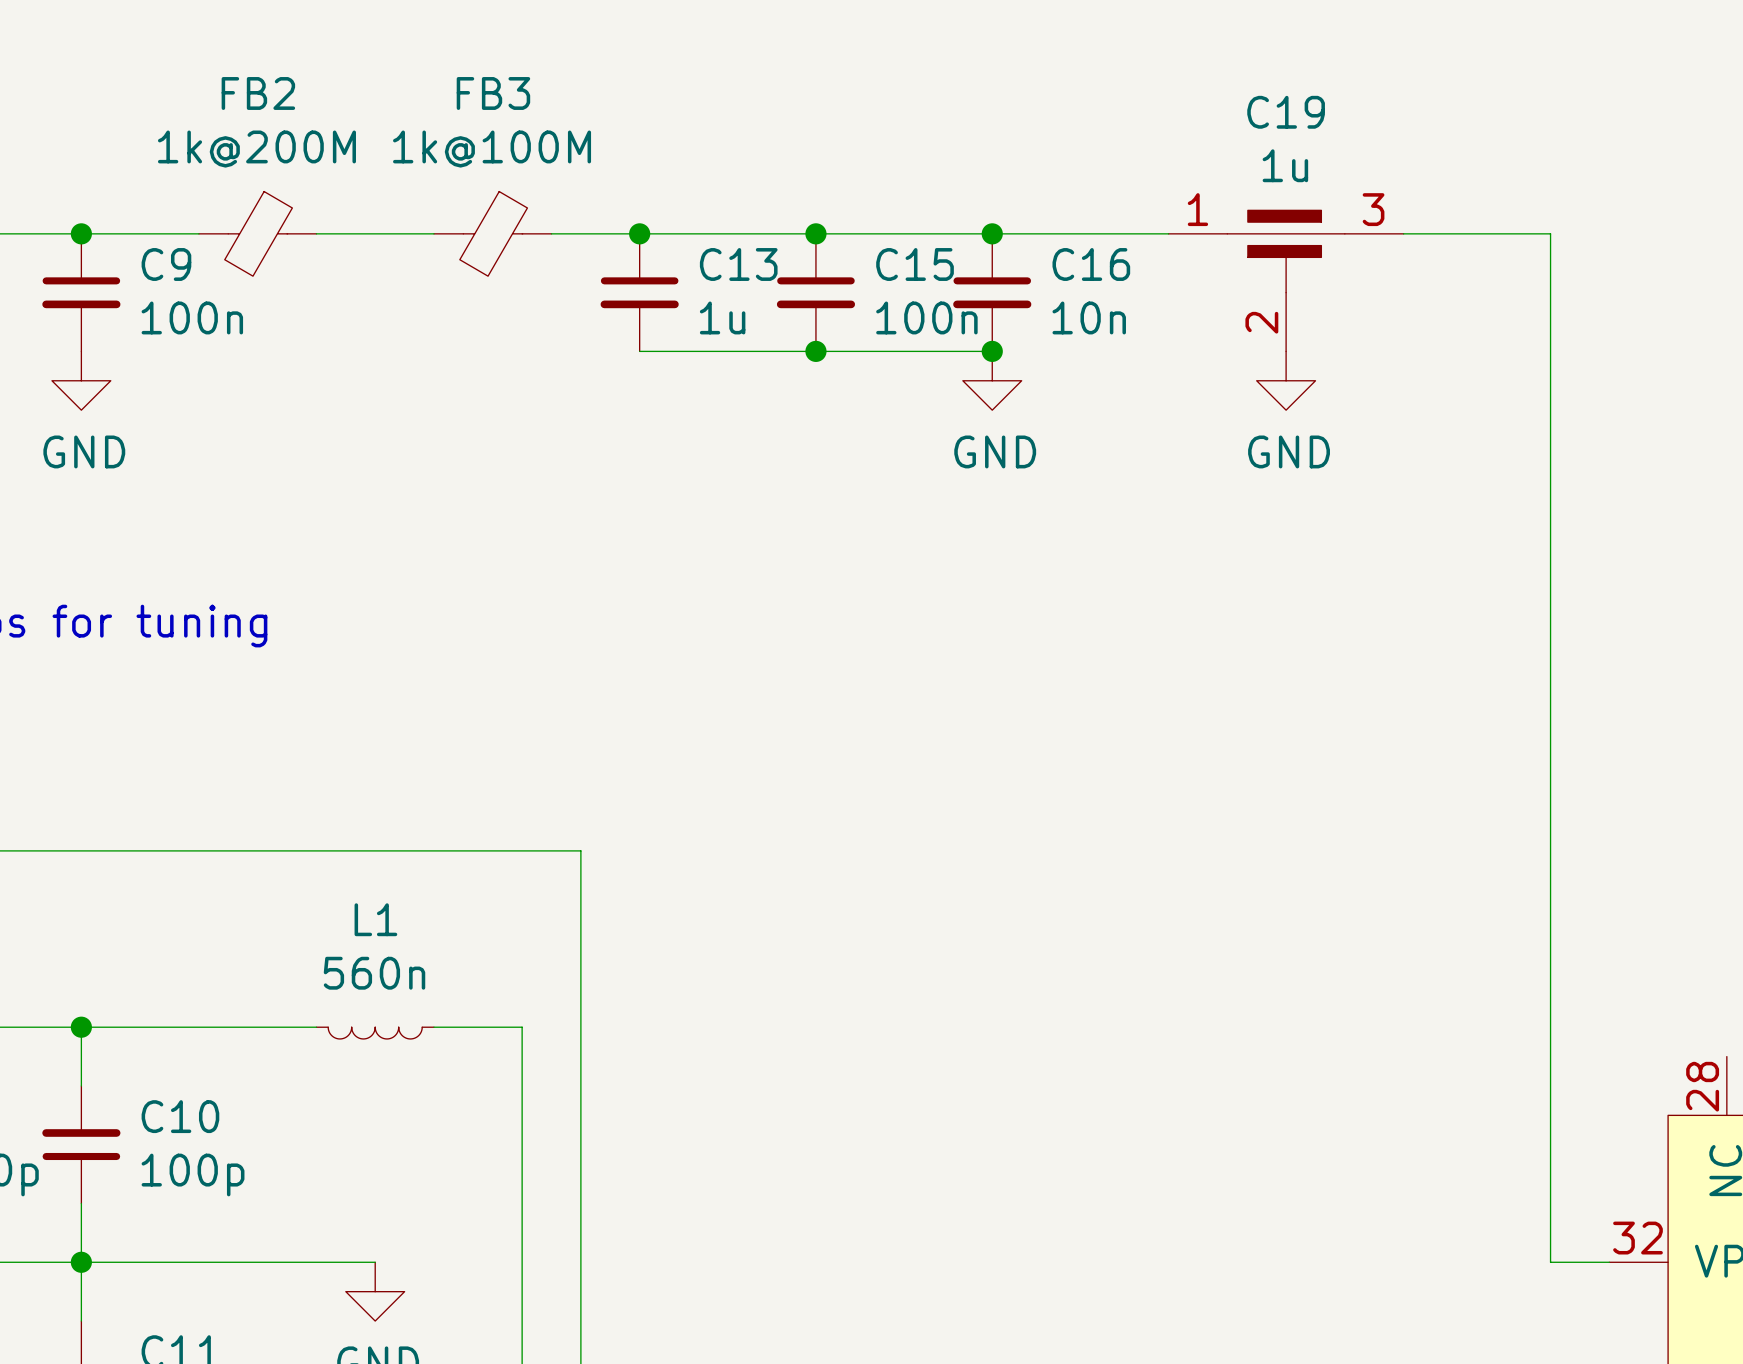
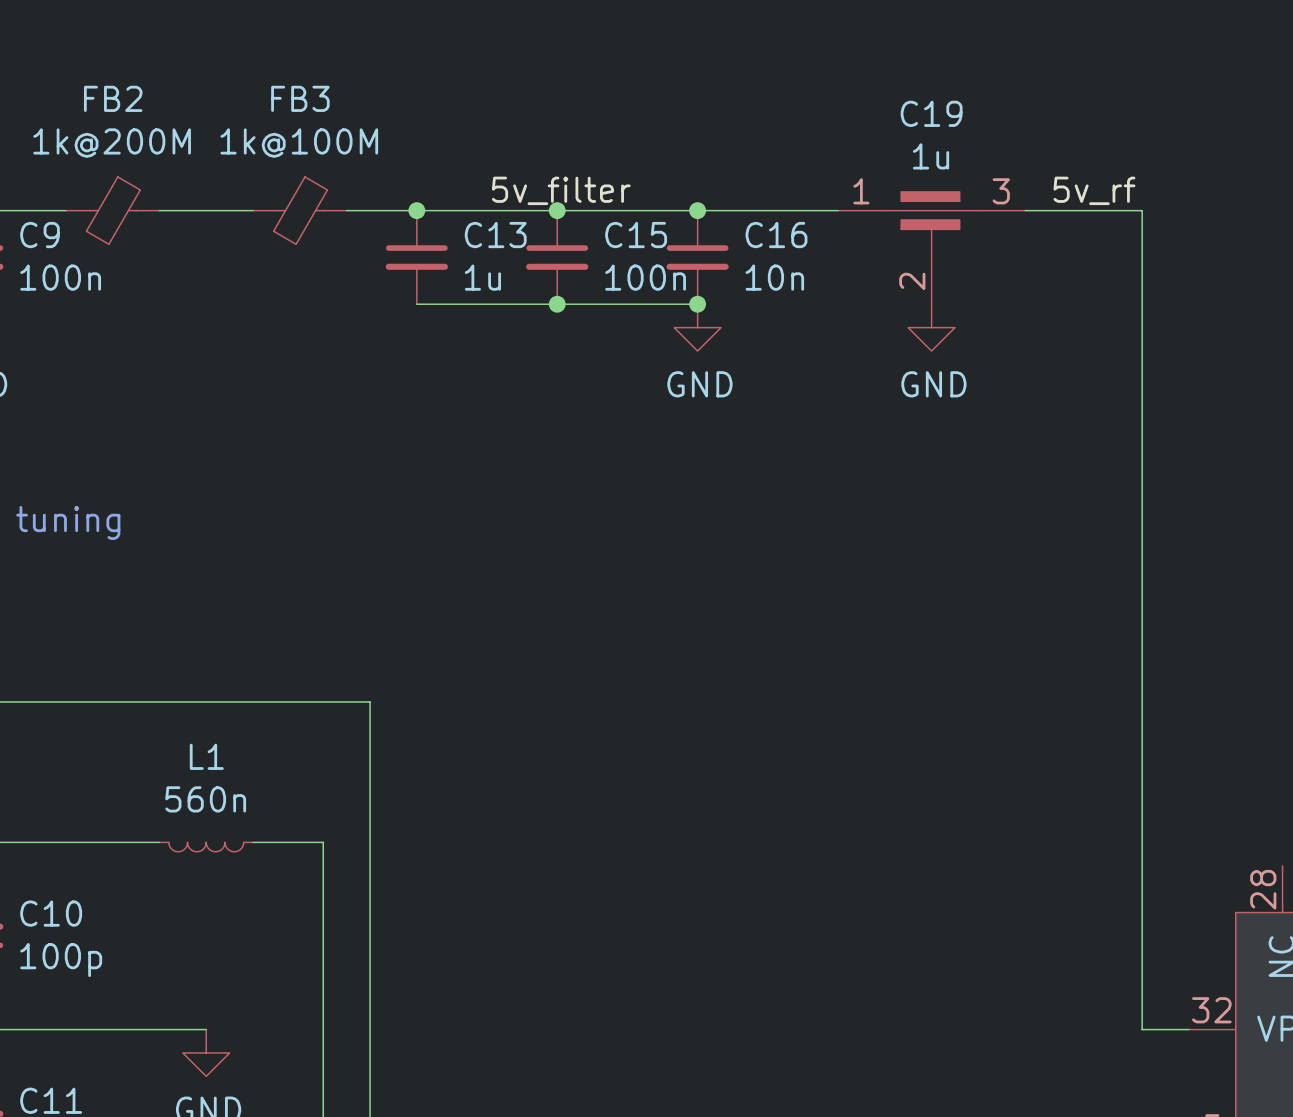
label: none -> 5v_filter (561, 190)
label: none -> 5v_rf (1094, 190)

